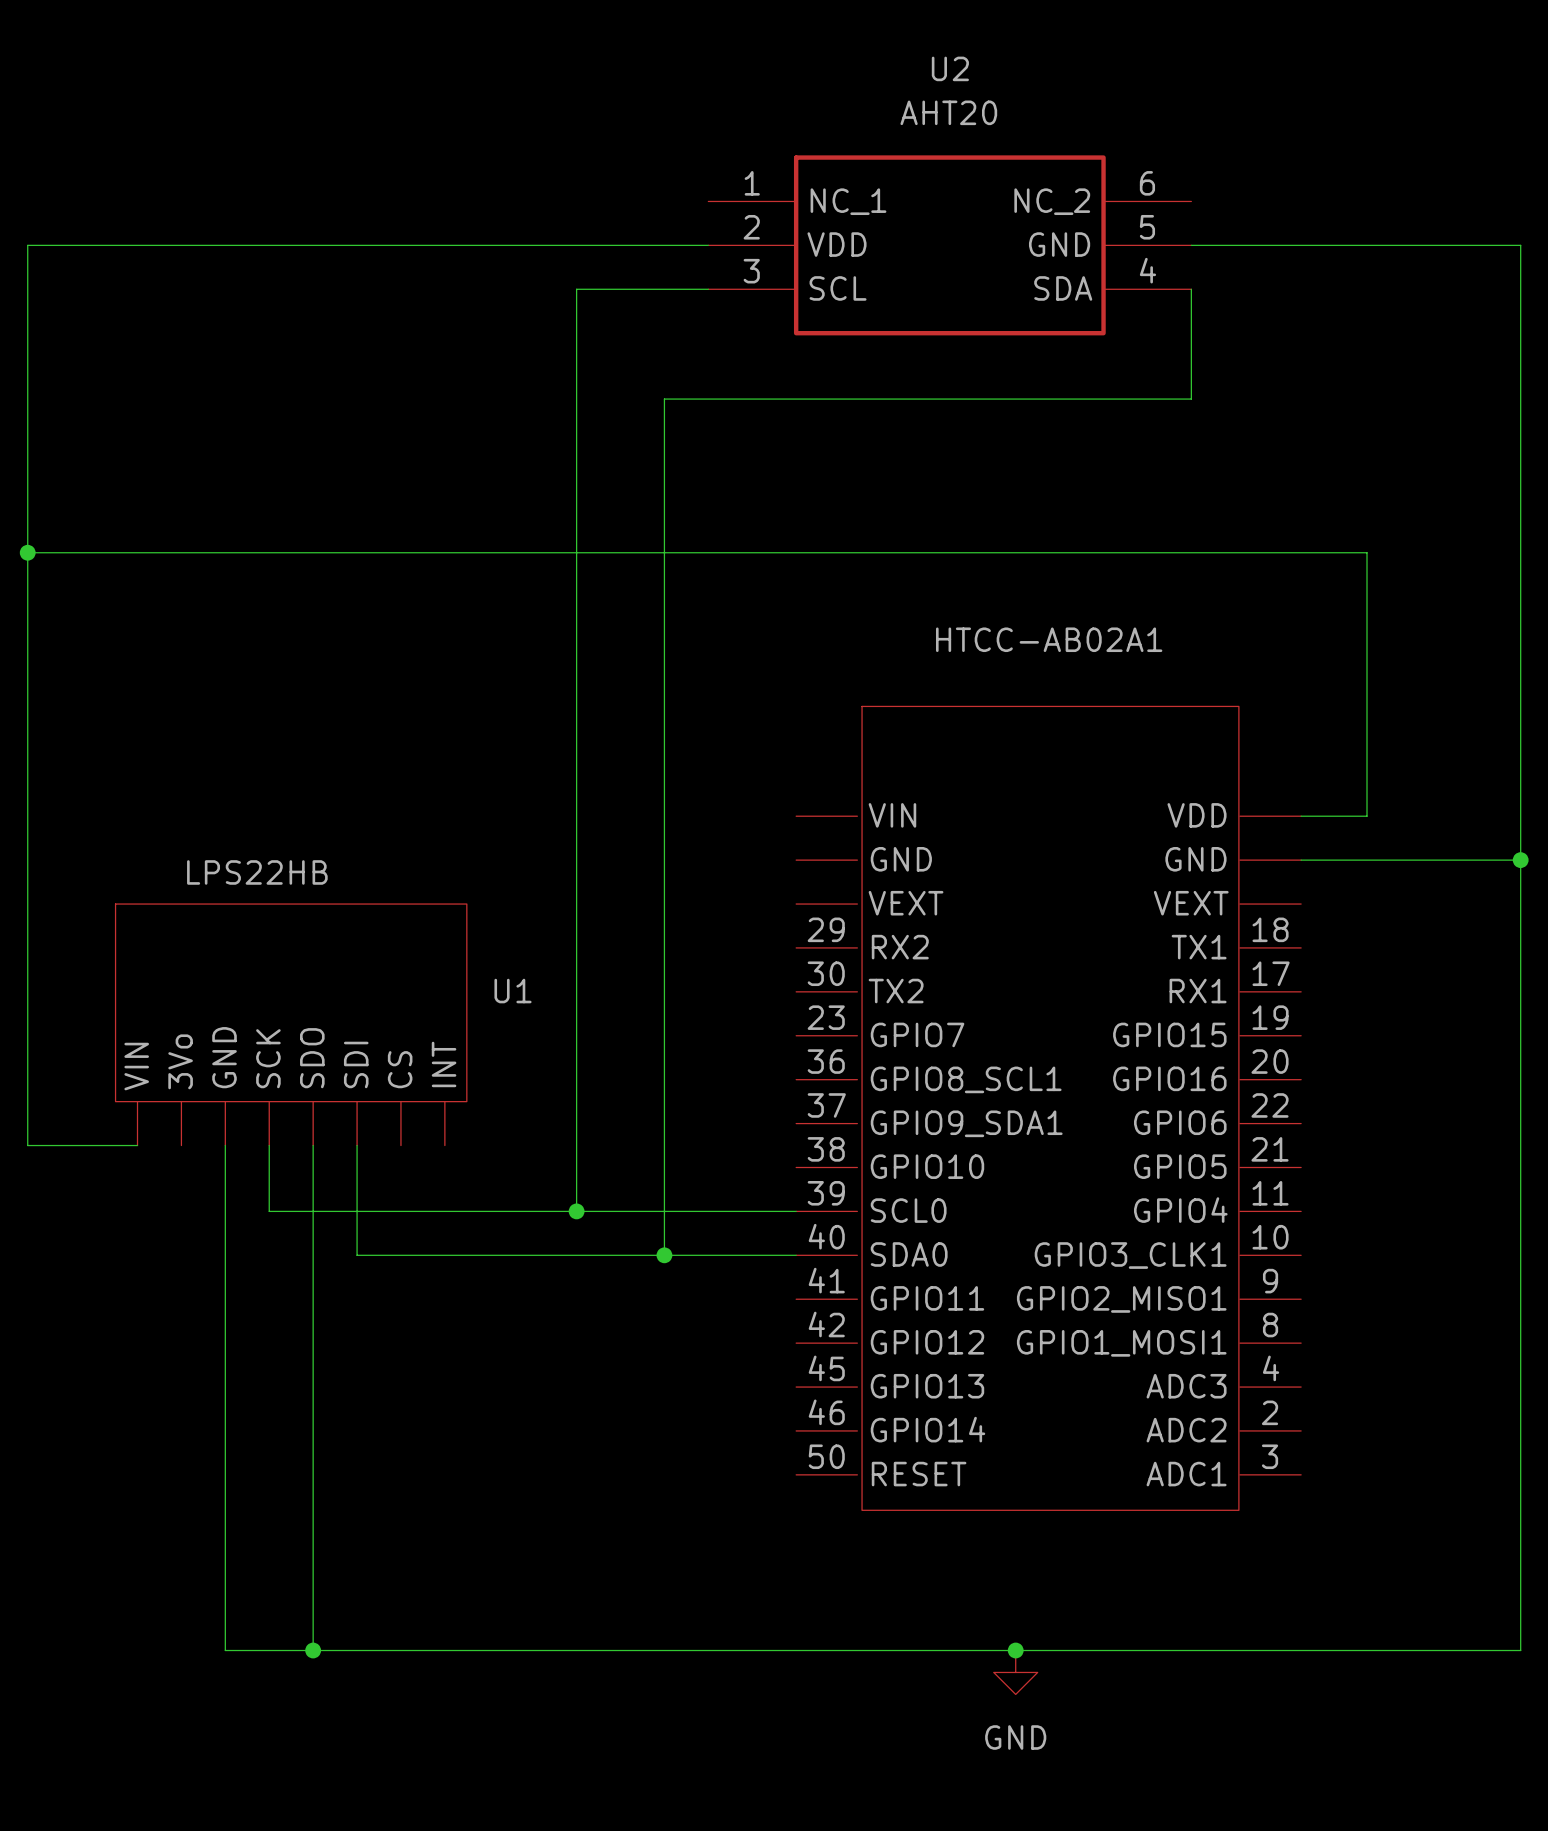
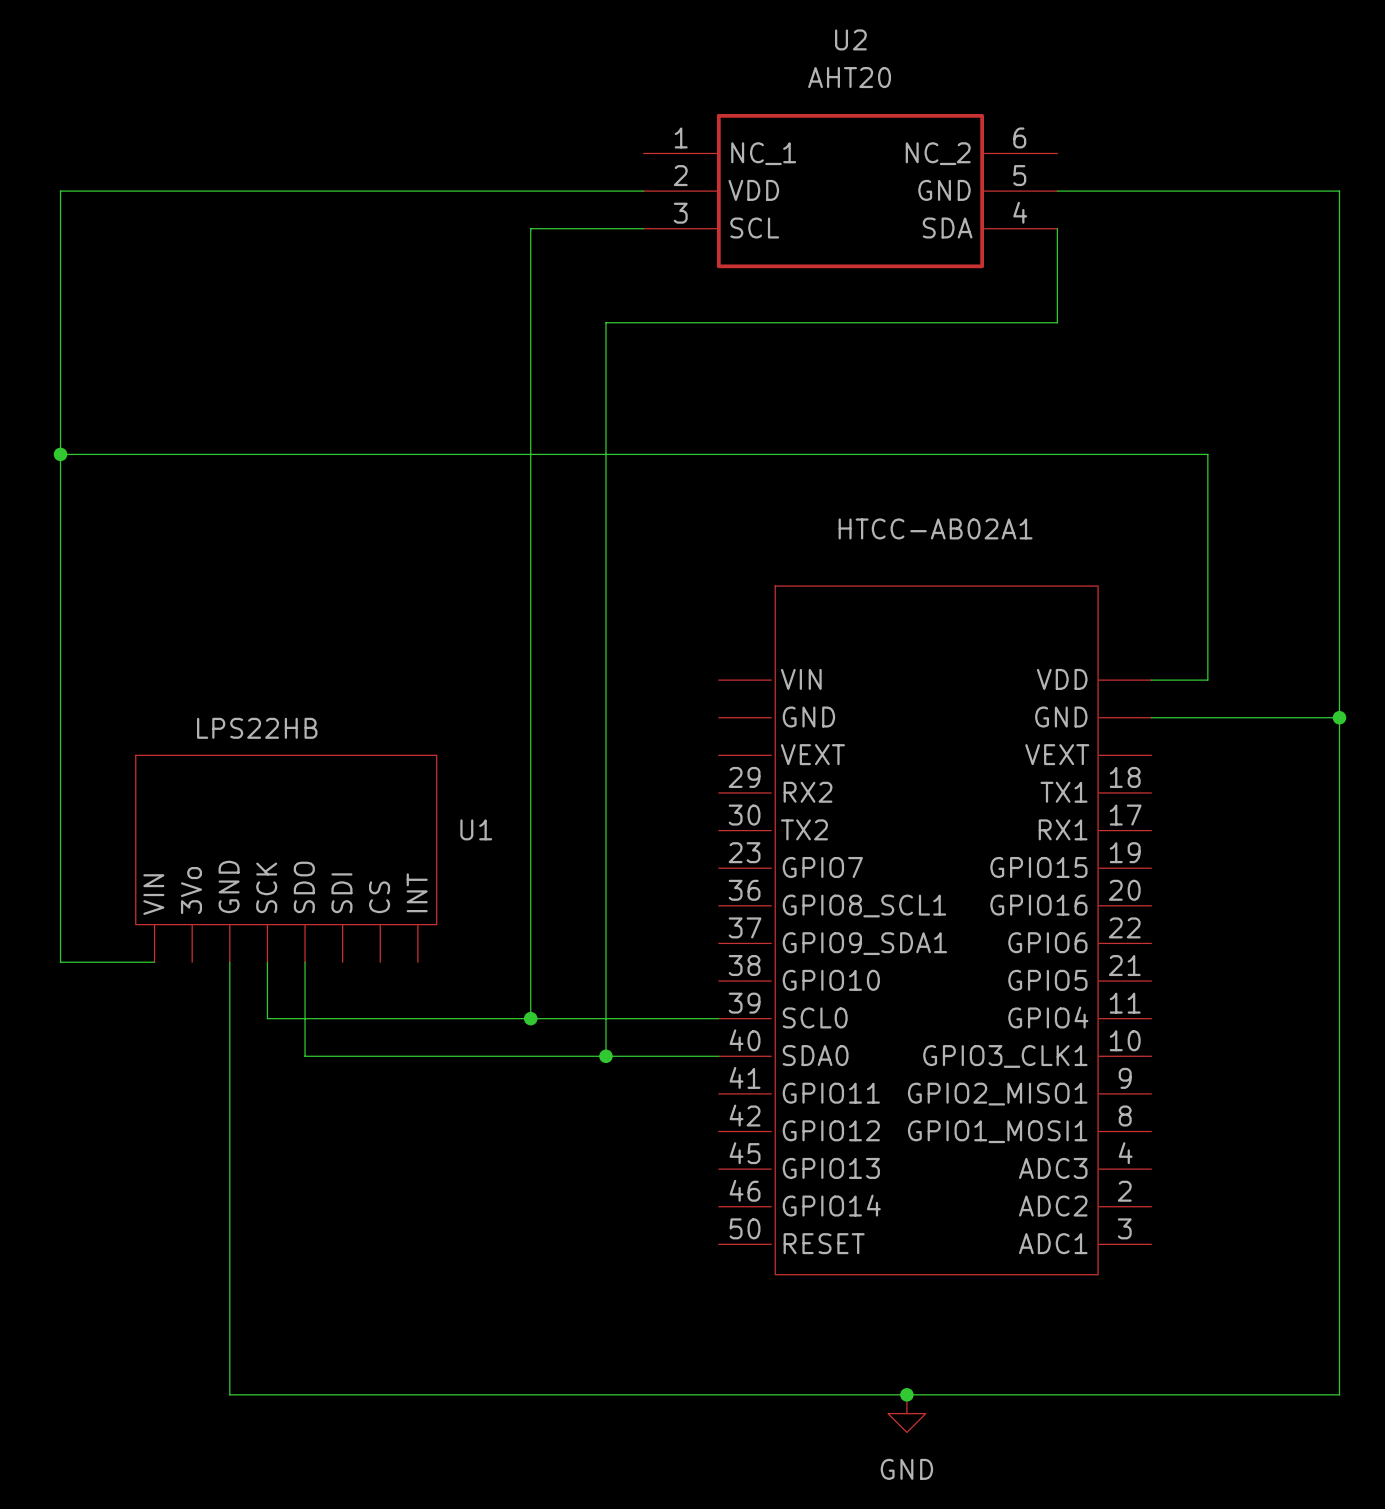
wire: (357, 1145) (357, 1255) -> (305, 1056) (342, 1056)
wire: (313, 1255) (313, 1650) -> none
junction: (313, 1650) -> none

